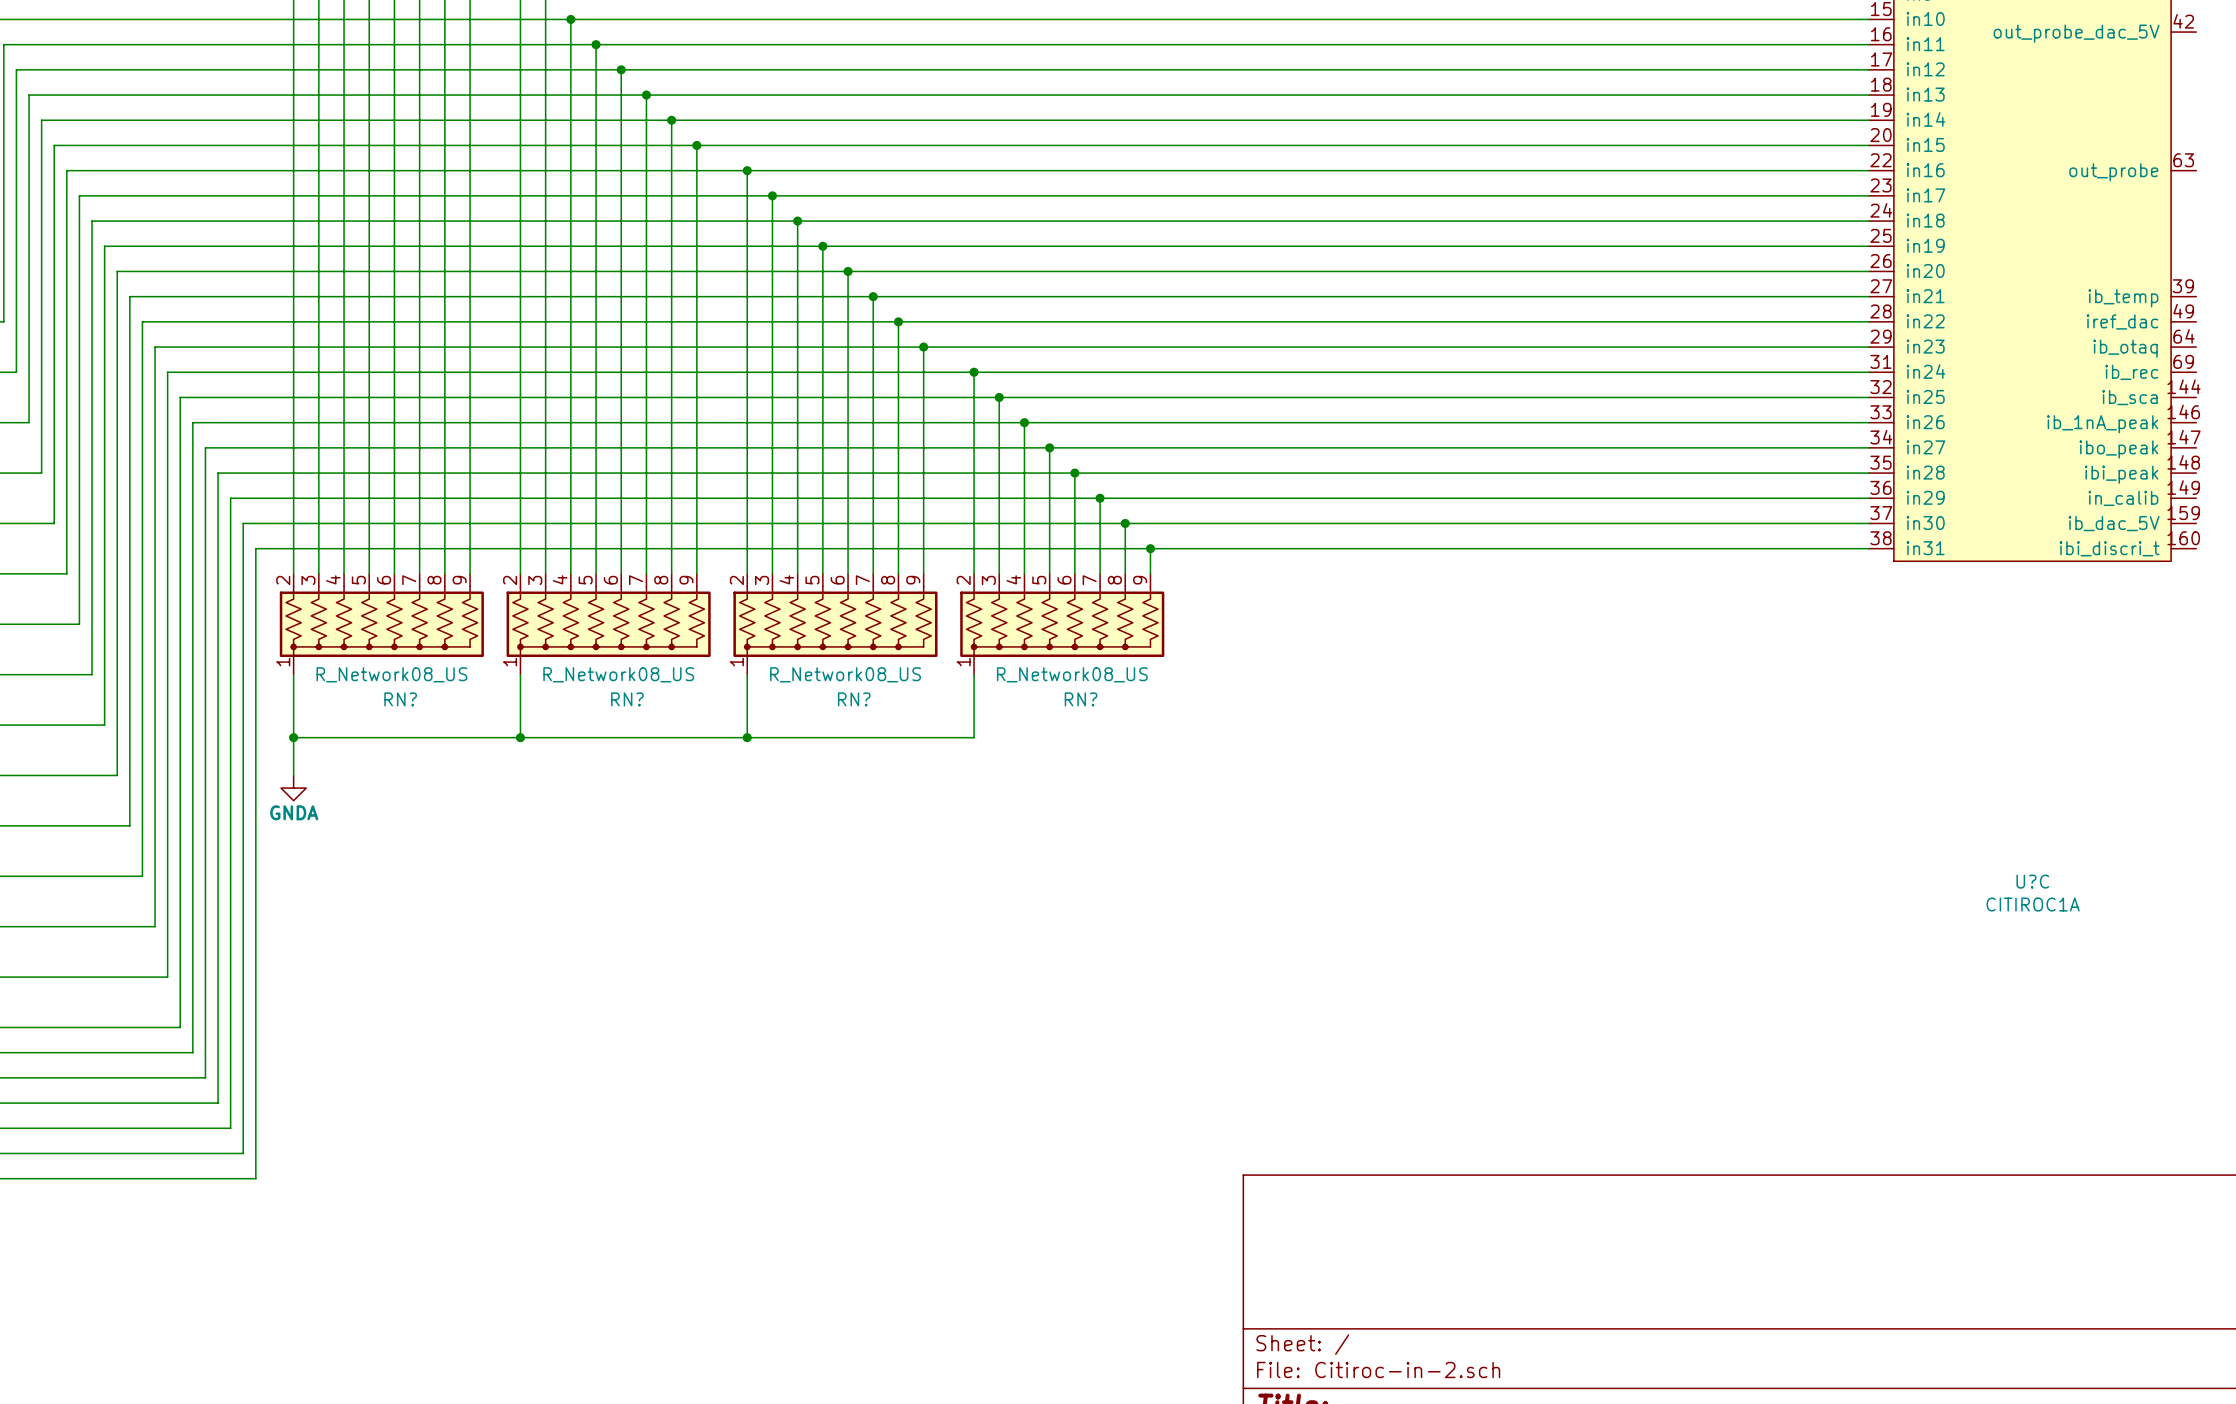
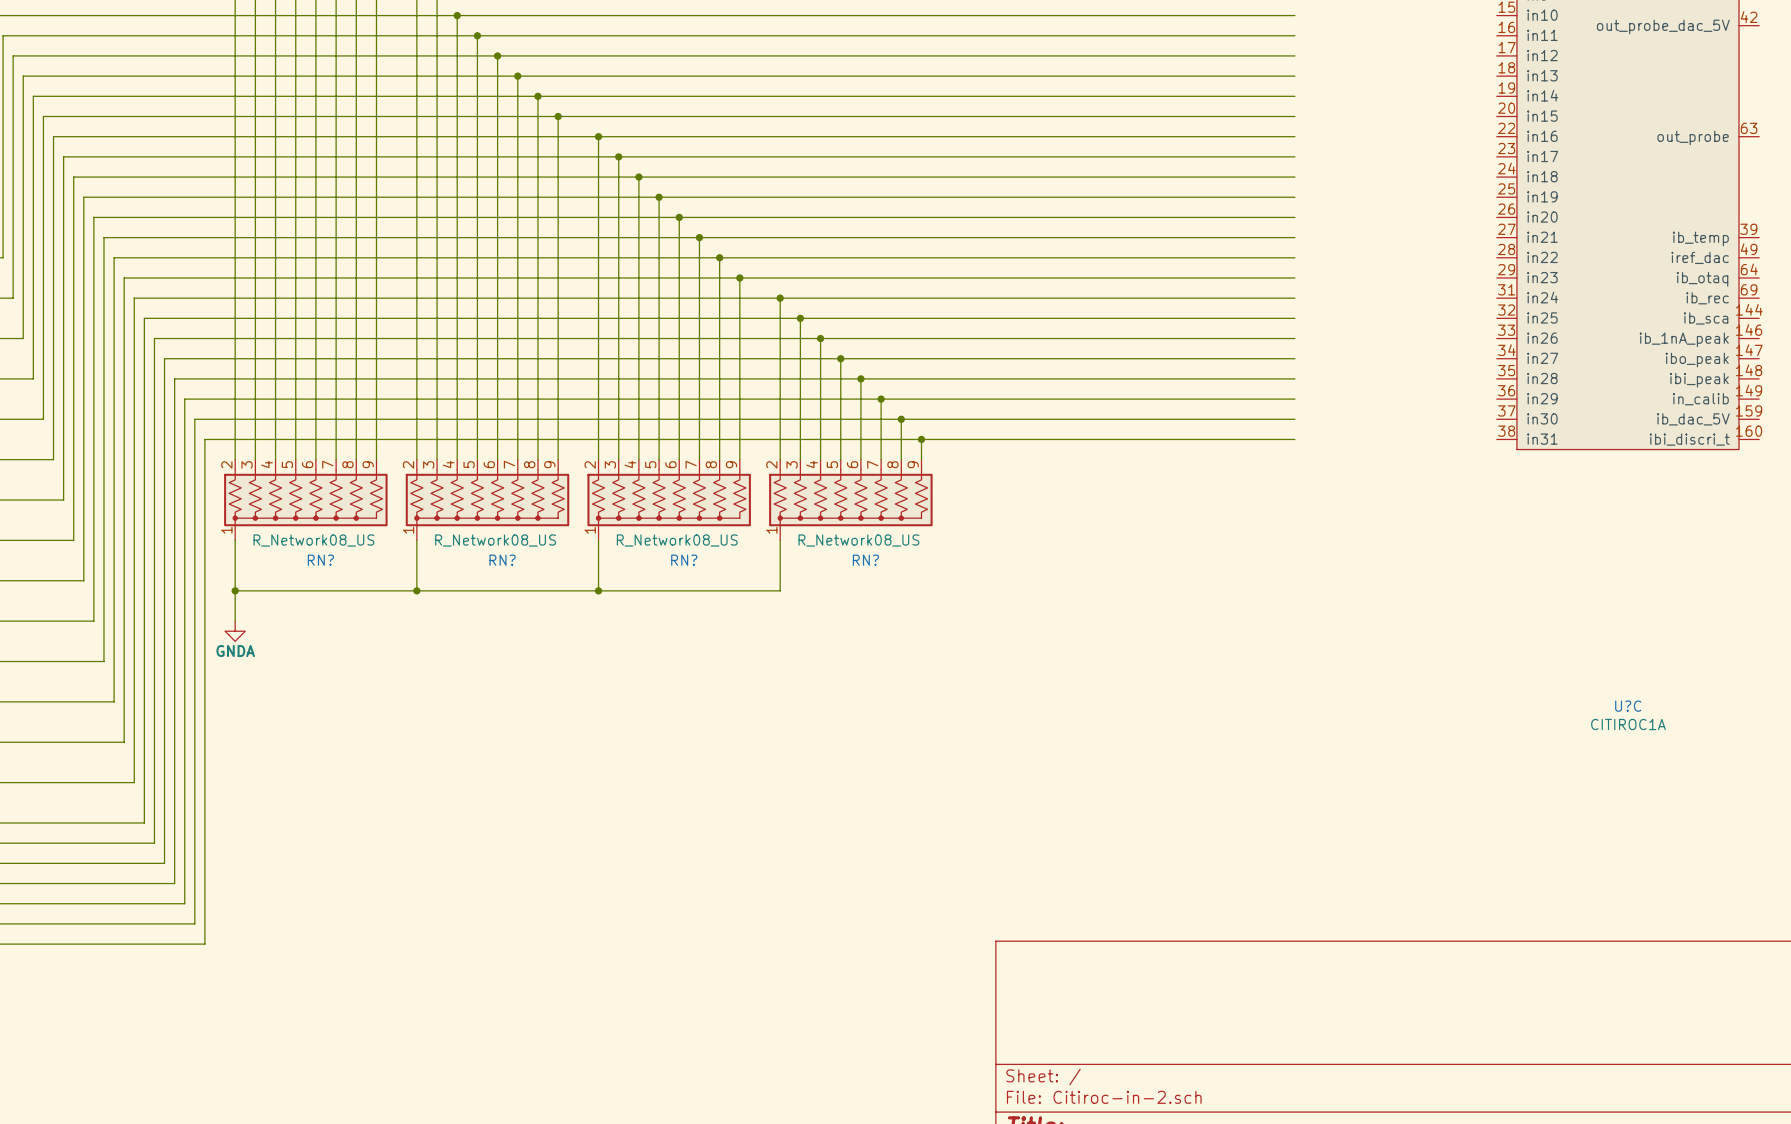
wire: (1616, 19) (1868, 19) -> none
wire: (1616, 44) (1868, 44) -> none
wire: (1616, 69) (1868, 69) -> none
wire: (1616, 95) (1868, 95) -> none
wire: (1616, 120) (1868, 120) -> none
wire: (1616, 145) (1868, 145) -> none
wire: (1616, 170) (1868, 170) -> none
wire: (1616, 195) (1868, 195) -> none
wire: (1616, 221) (1868, 221) -> none
wire: (1616, 246) (1868, 246) -> none
wire: (1616, 271) (1868, 271) -> none
wire: (1616, 296) (1868, 296) -> none
wire: (1616, 321) (1868, 321) -> none
wire: (1616, 347) (1868, 347) -> none
wire: (1616, 372) (1868, 372) -> none
wire: (1616, 397) (1868, 397) -> none
wire: (1616, 422) (1868, 422) -> none
wire: (1616, 447) (1868, 447) -> none
wire: (1616, 473) (1868, 473) -> none
wire: (1616, 498) (1868, 498) -> none
wire: (1616, 523) (1868, 523) -> none
wire: (1616, 548) (1868, 548) -> none

